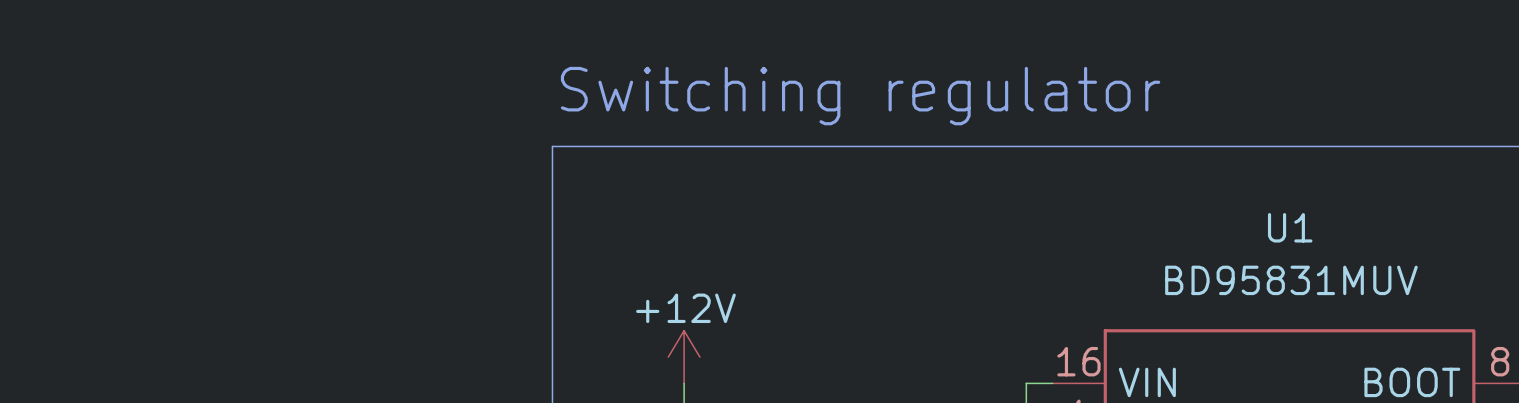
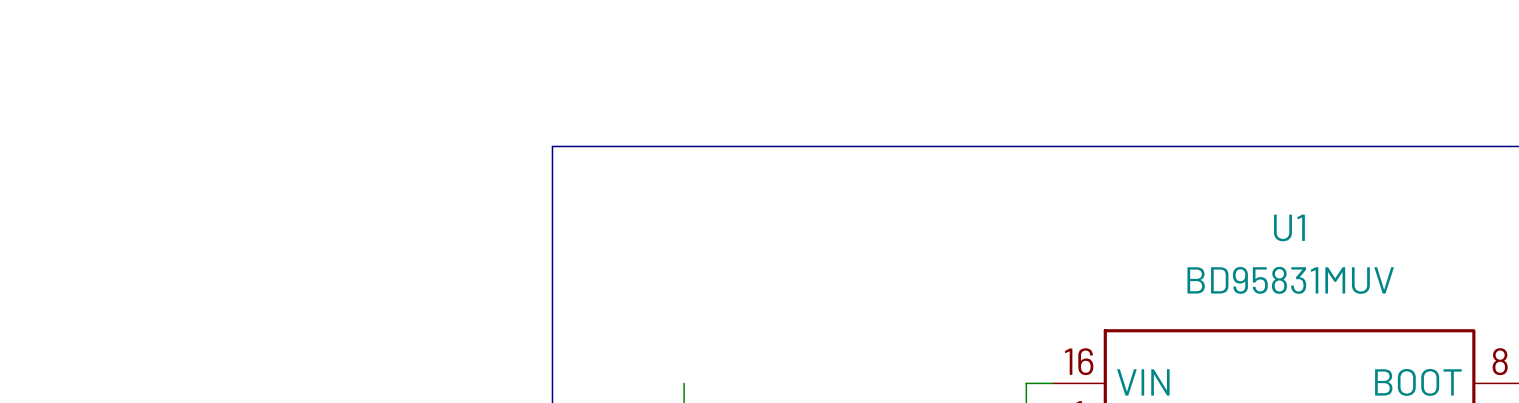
text: Switching regulator (860, 96) -> none
power symbol: +12V (684, 357) -> none

